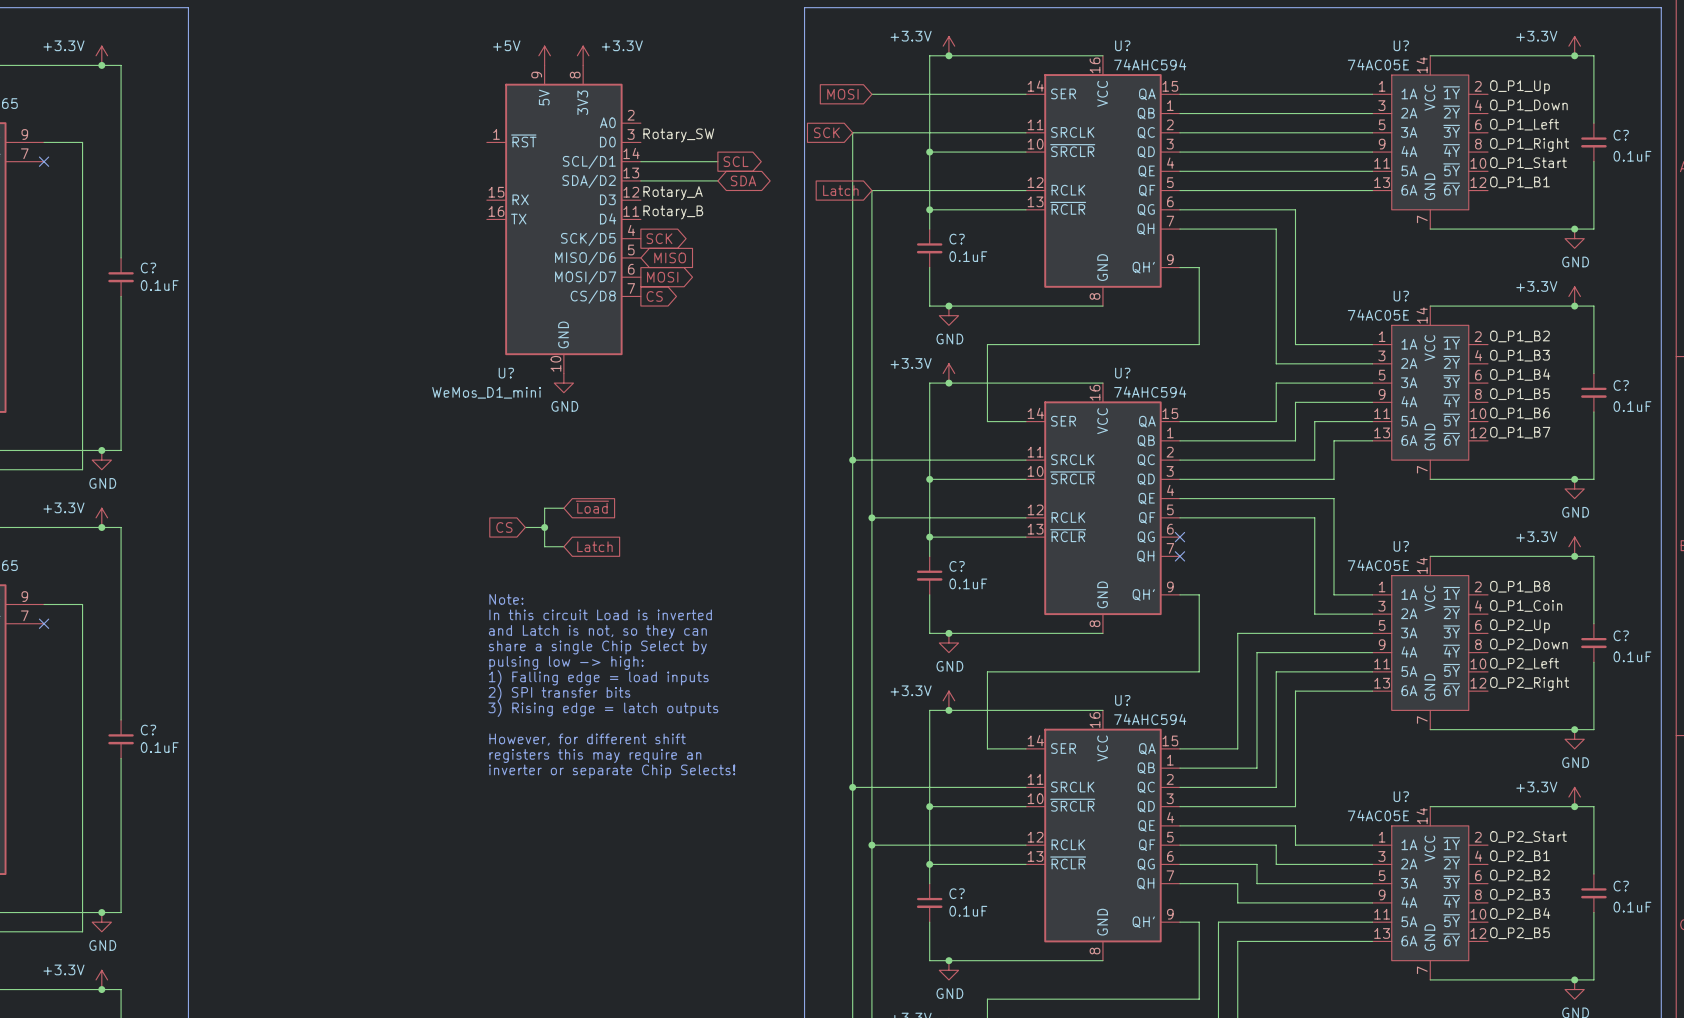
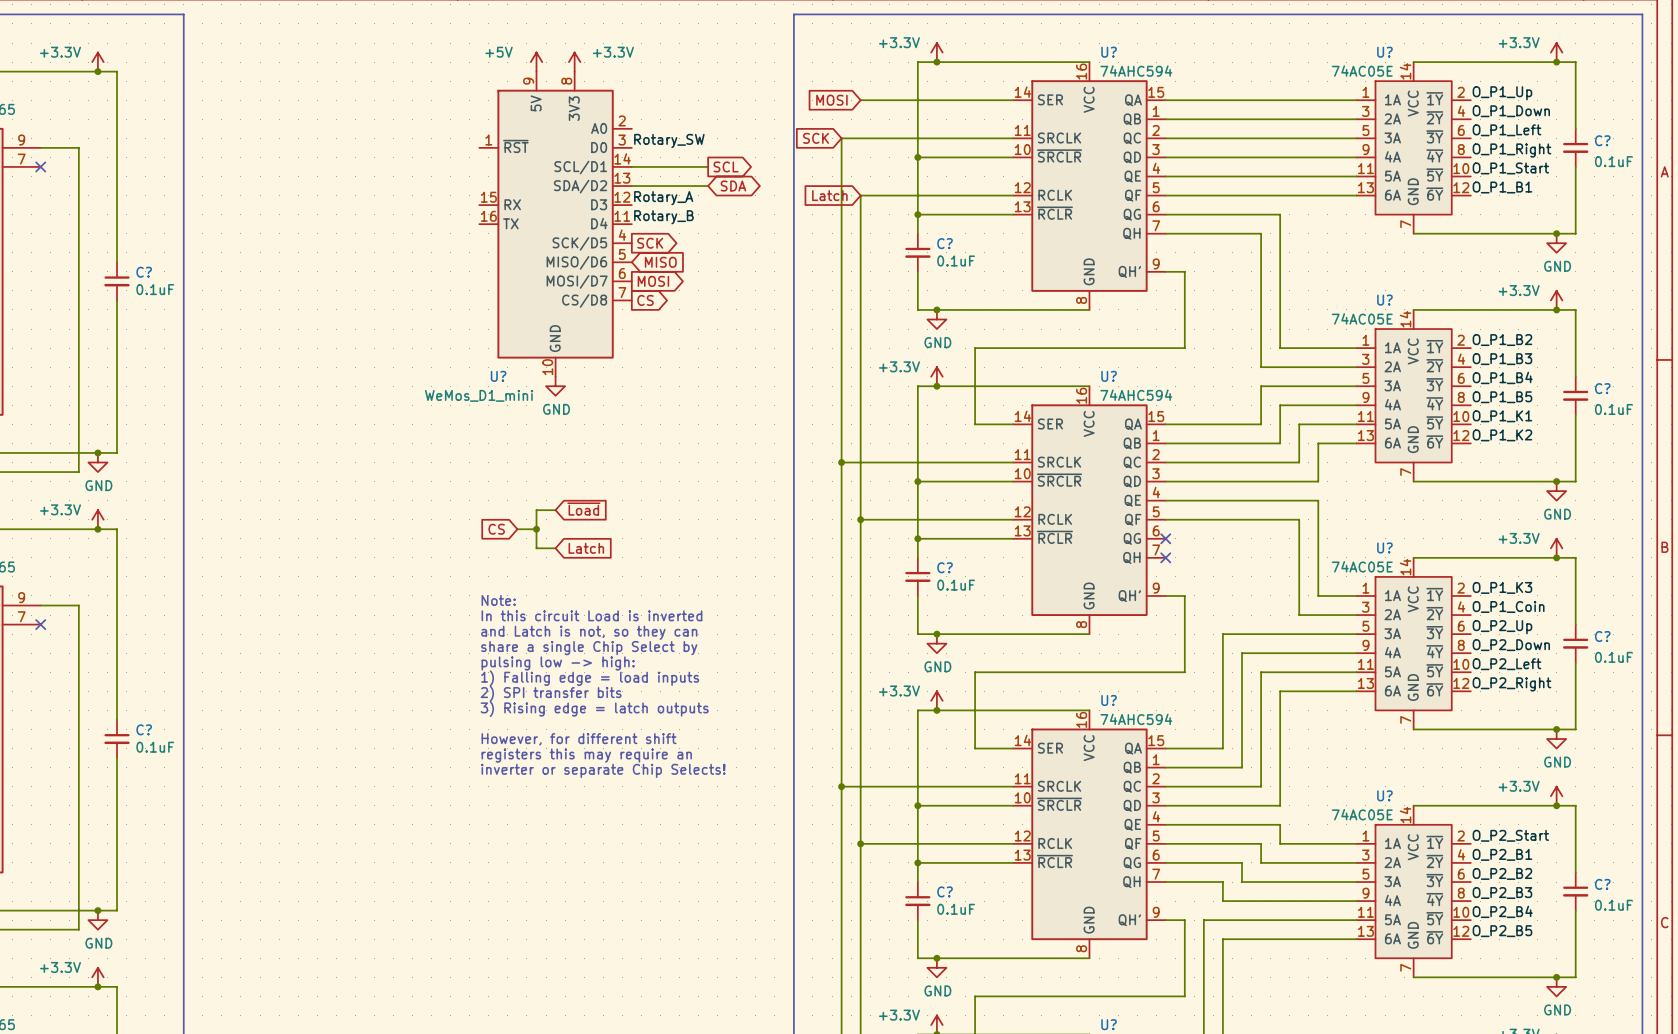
label: O_P1_B6 (1519, 413) -> O_P1_K1 (1502, 416)
label: O_P1_B7 (1520, 432) -> O_P1_K2 (1502, 435)
label: O_P1_B8 (1519, 586) -> O_P1_K3 (1502, 587)

